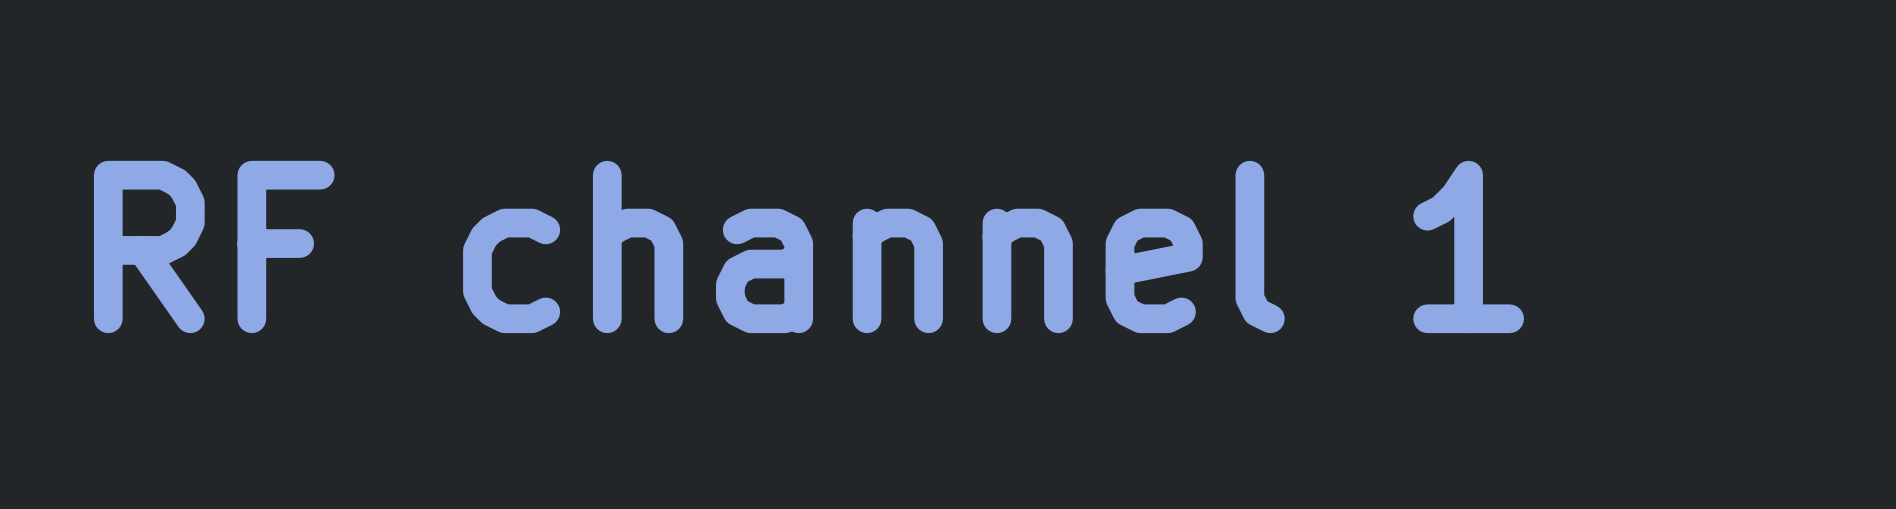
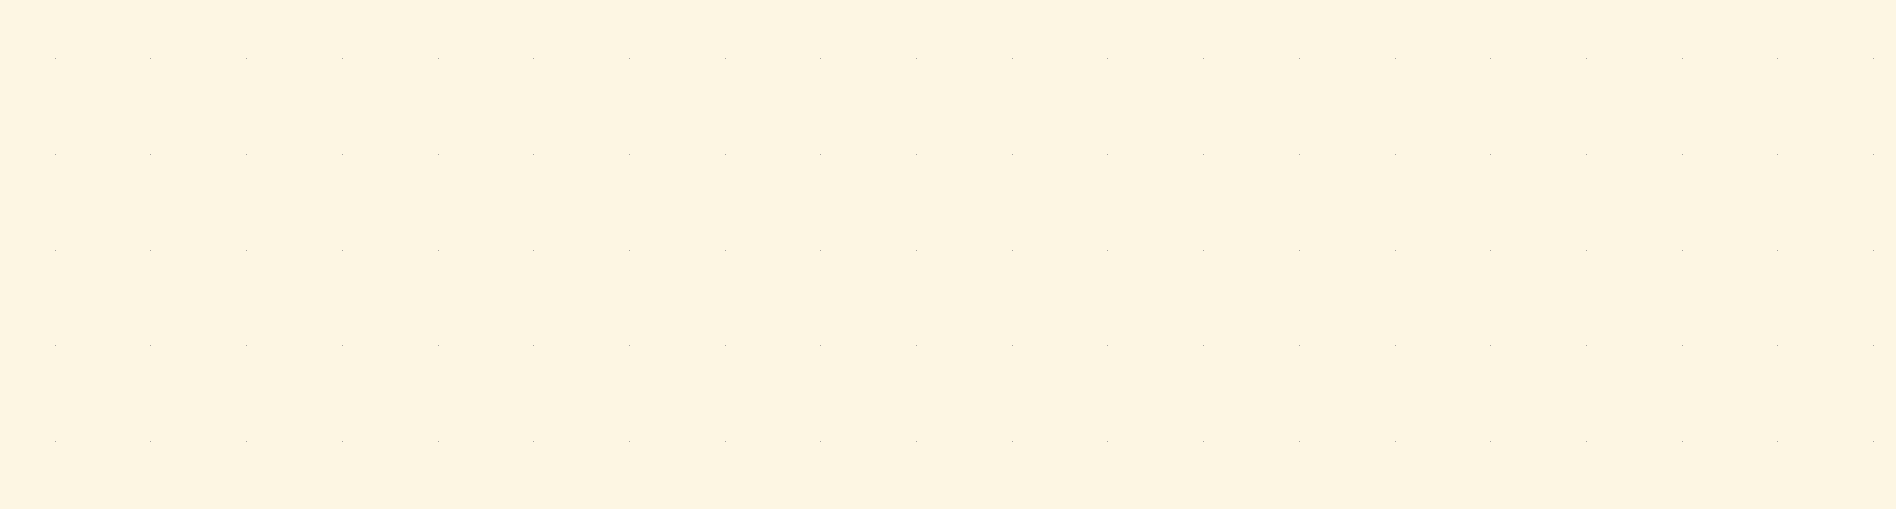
text: RF channel 1 (808, 246) -> none

